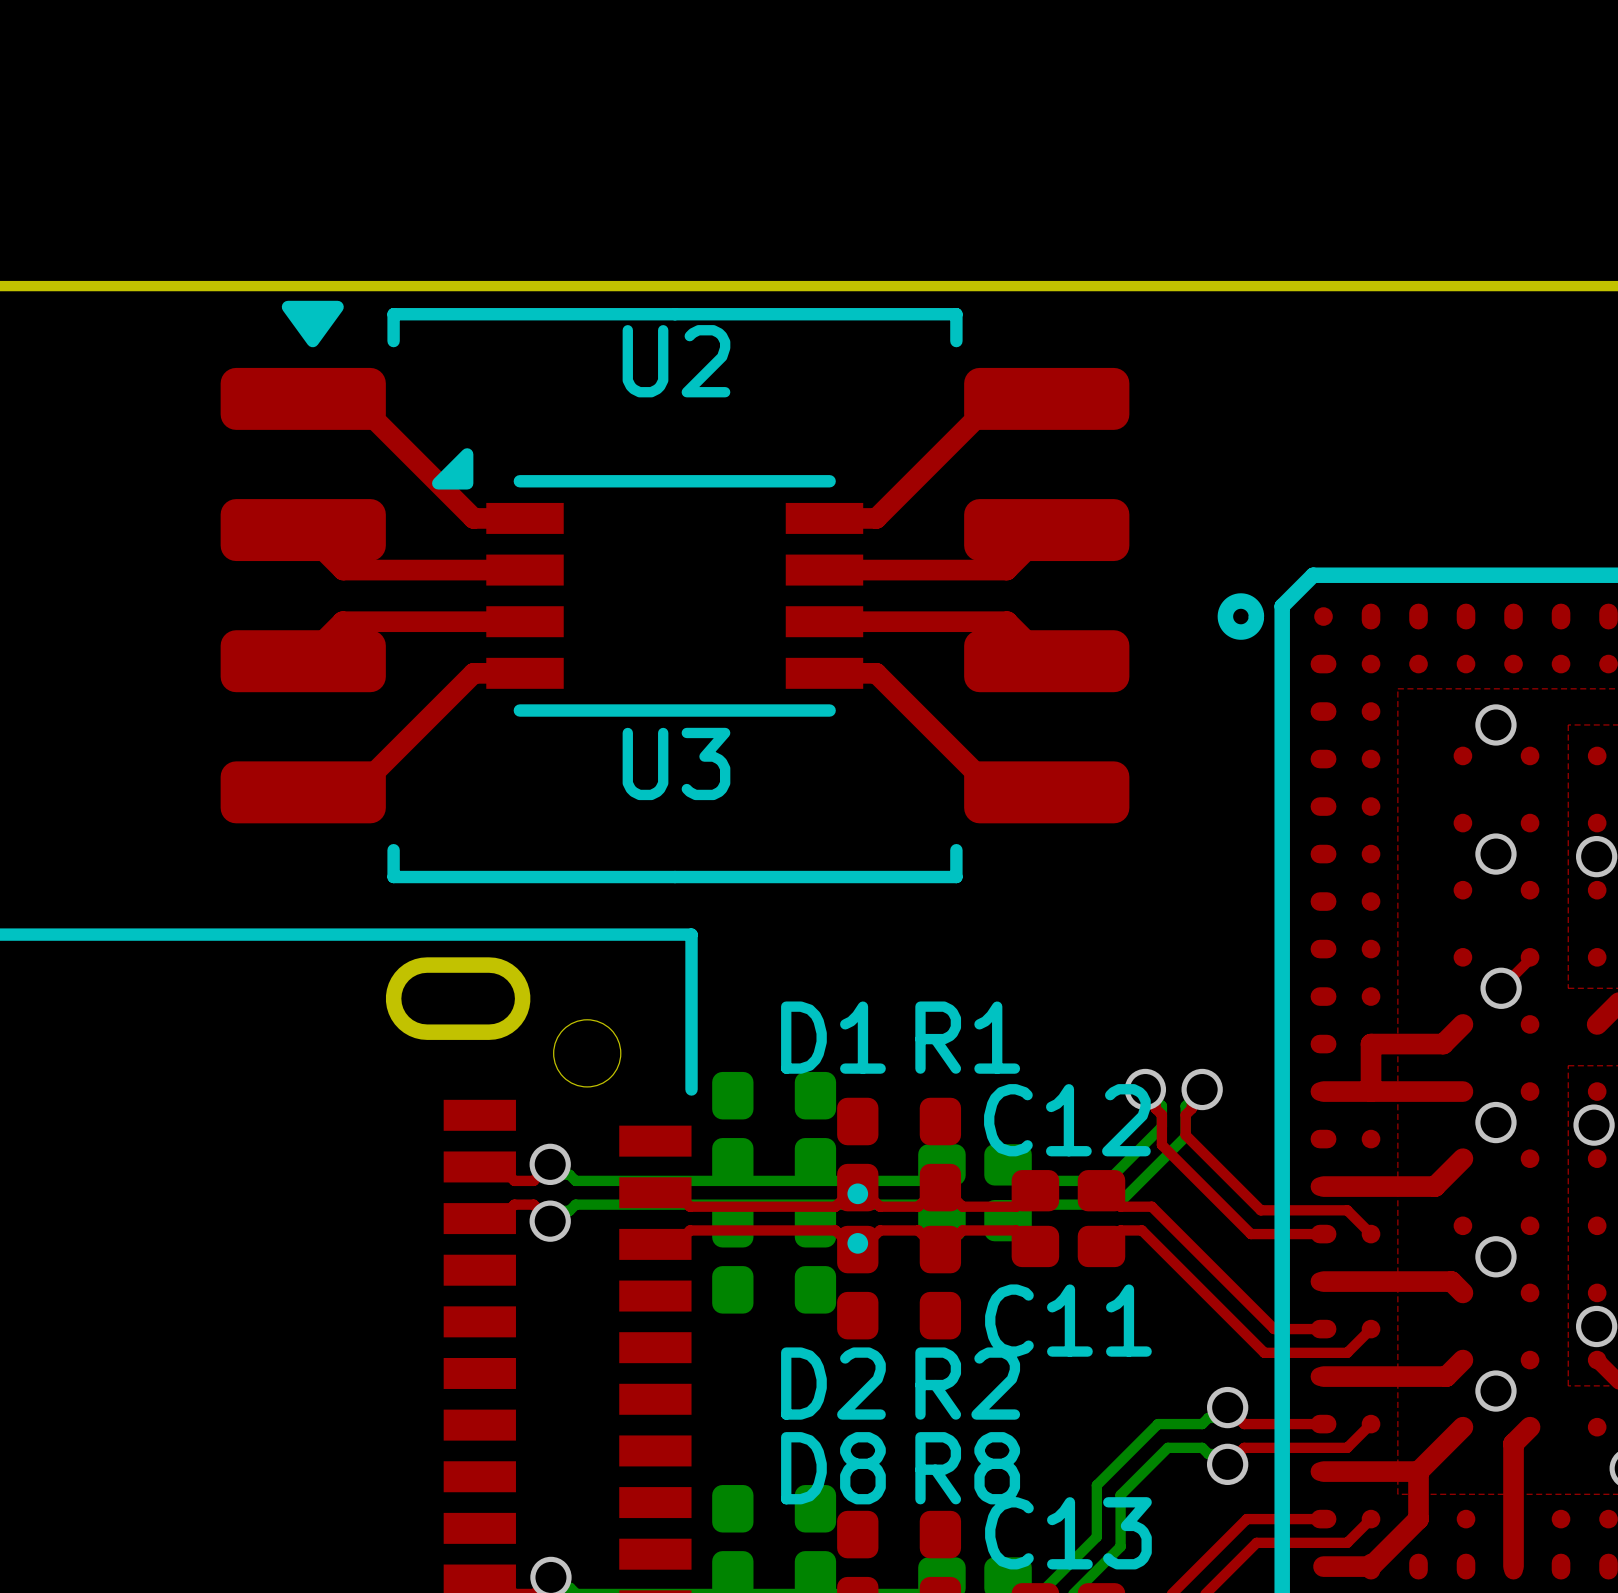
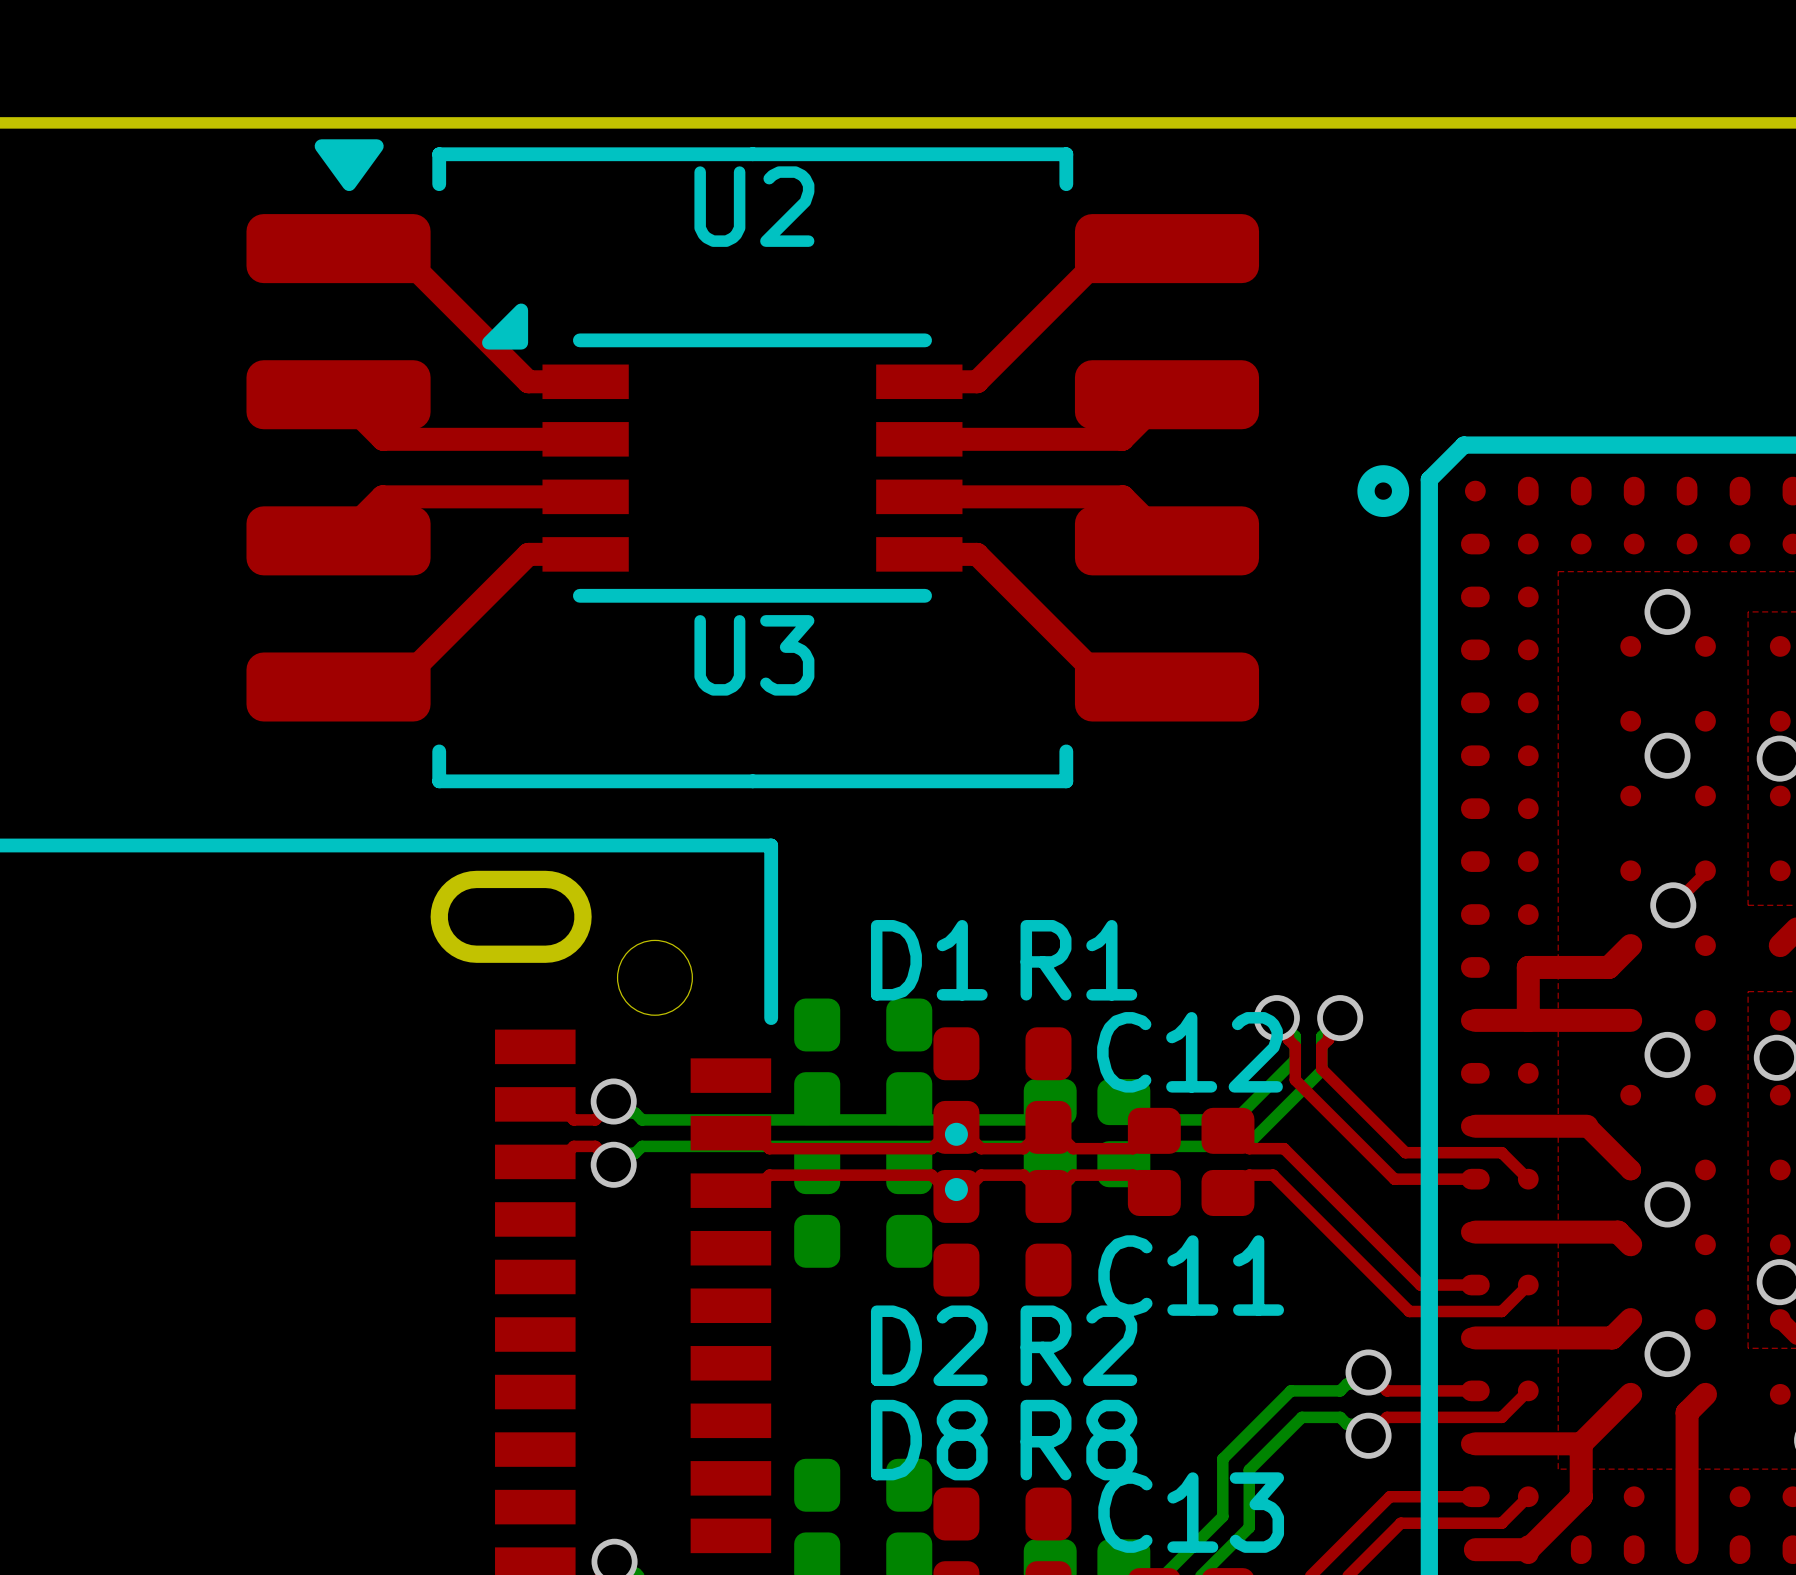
top track: (1462, 1158) (1435, 1186) (1423, 1186) -> (1630, 1169) (1586, 1126)

